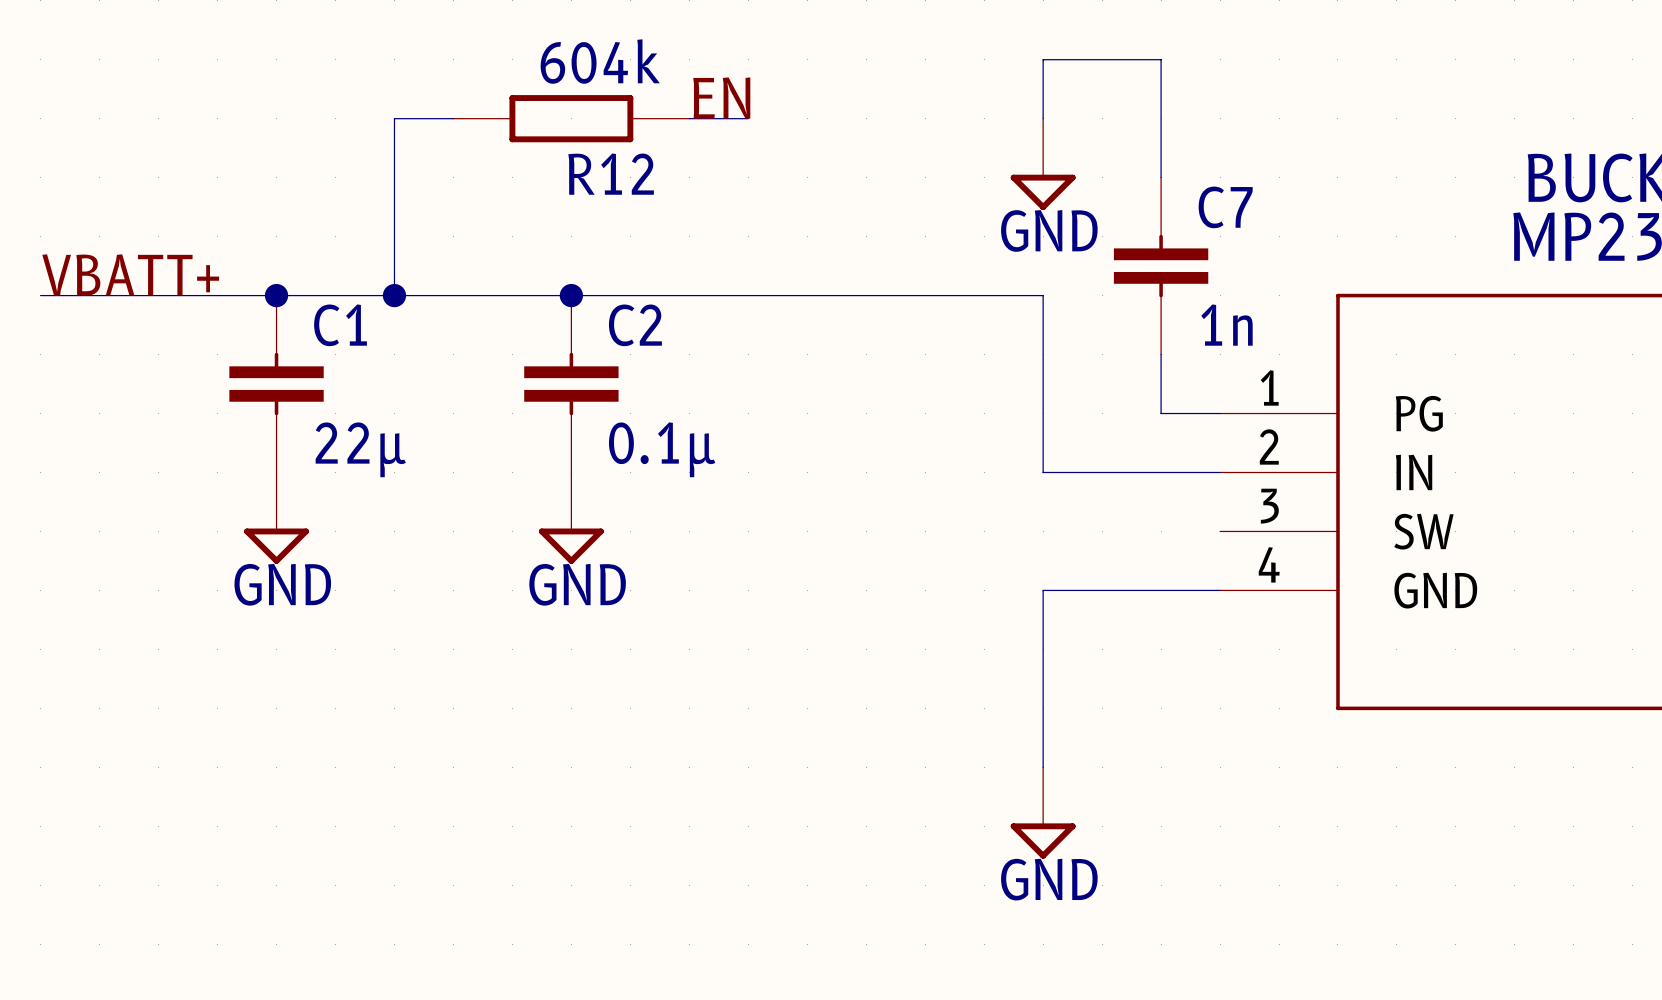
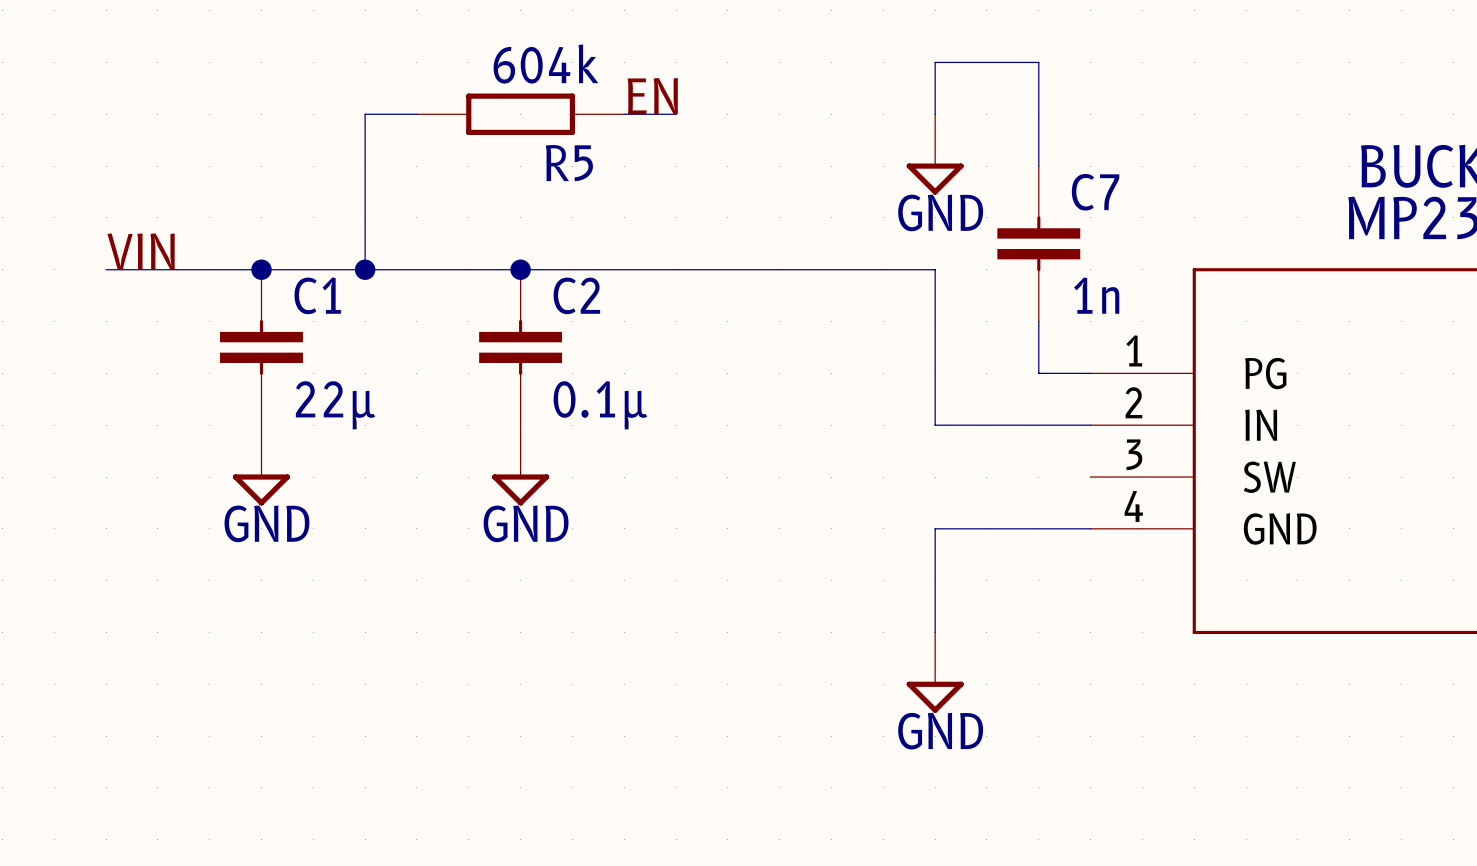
R12 name: R12 (611, 174) -> R5 (569, 163)
label: VBATT+ (130, 275) -> none
label: none -> VIN (141, 251)
wire: (40, 295) (99, 295) -> none
power symbol position: GND (1043, 813) -> GND (935, 672)

